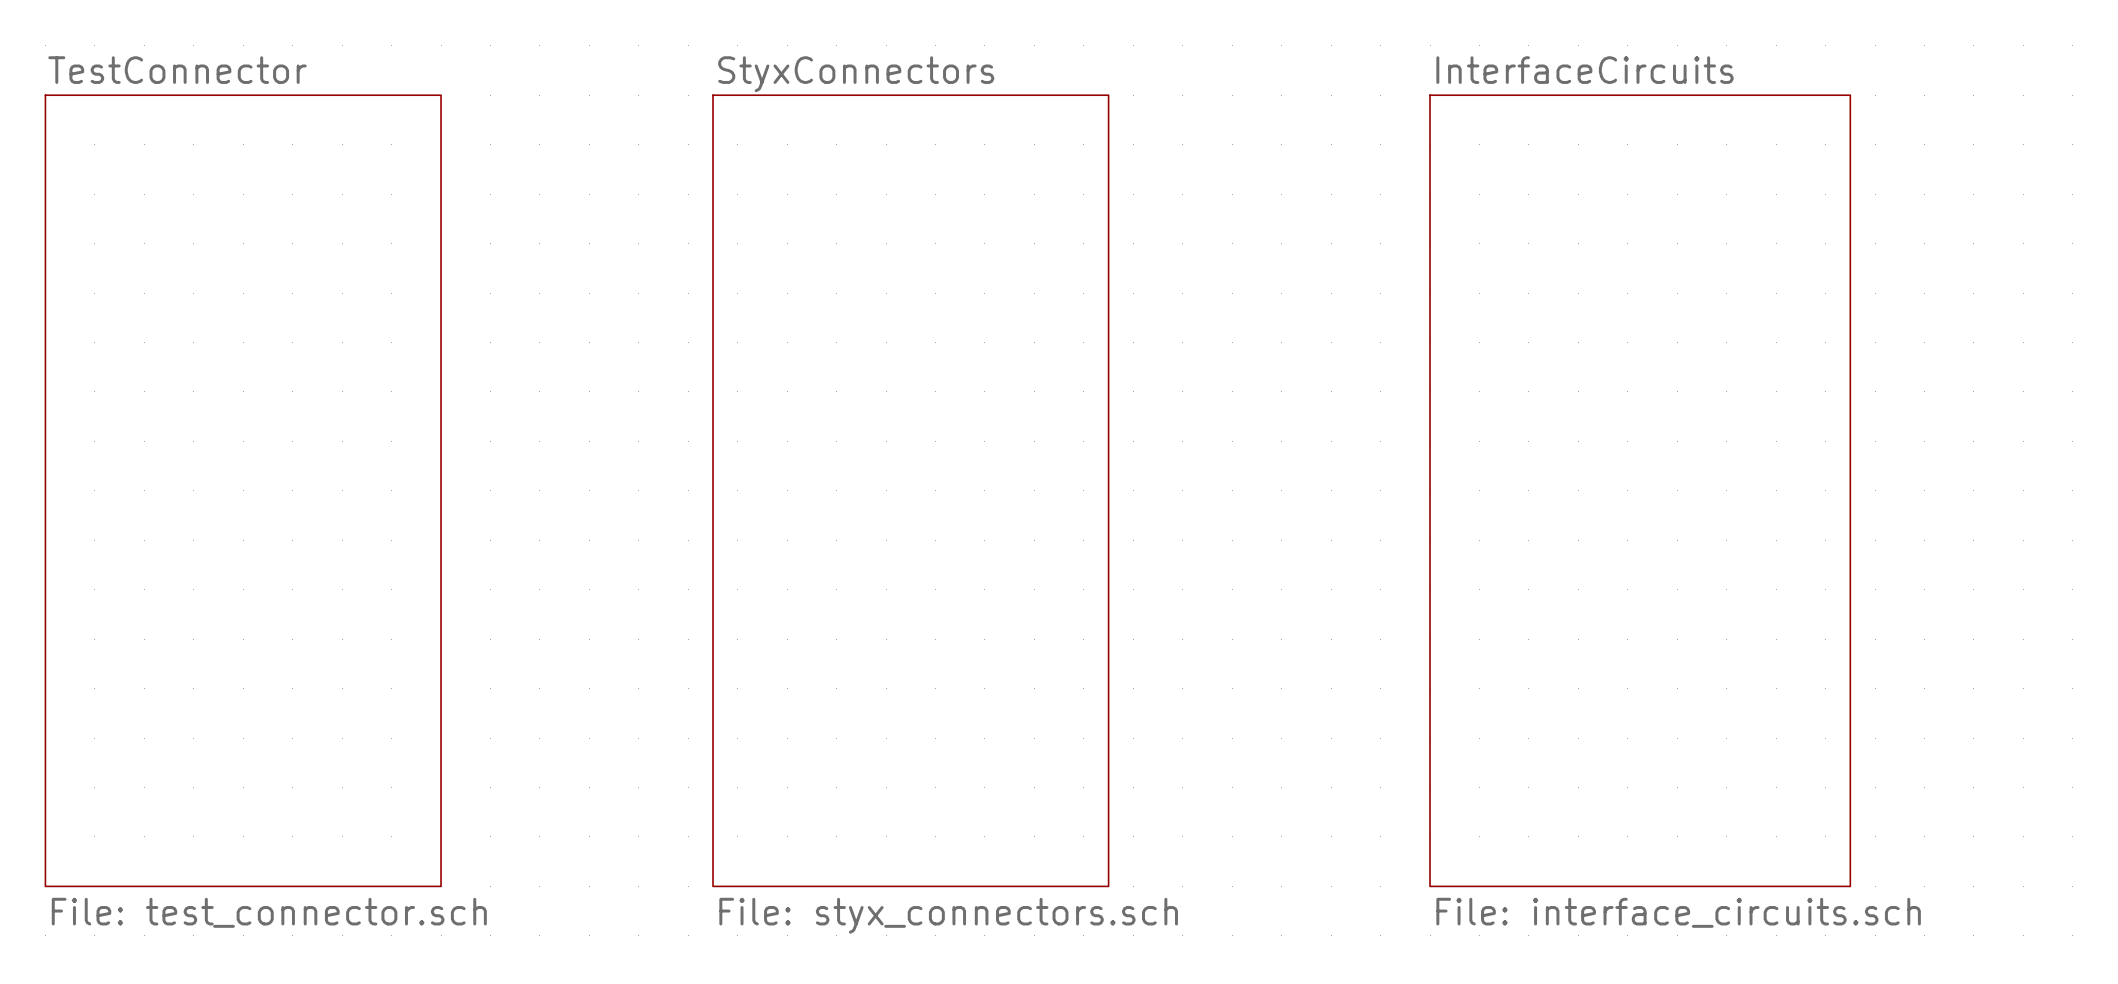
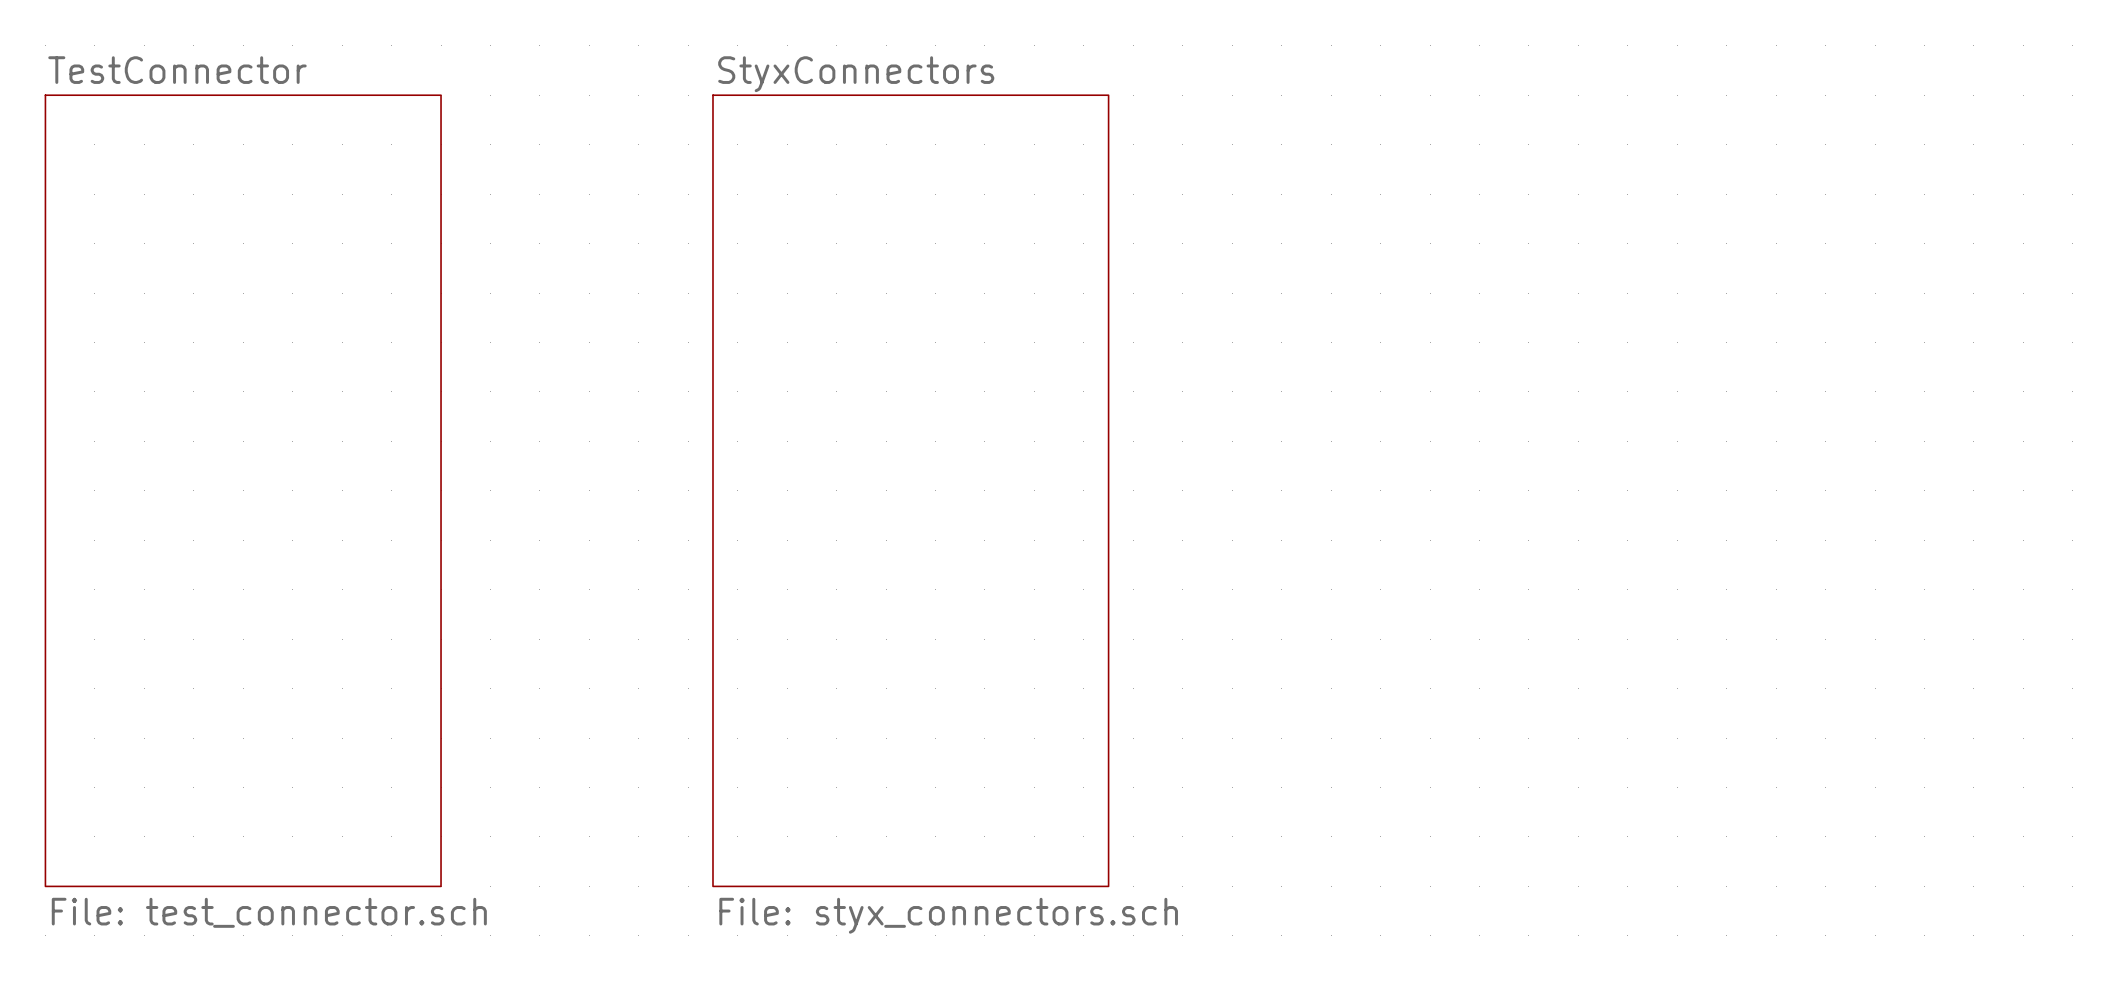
sheet InterfaceCircuits: File: interface_circuits.sch (1640, 490) -> none

